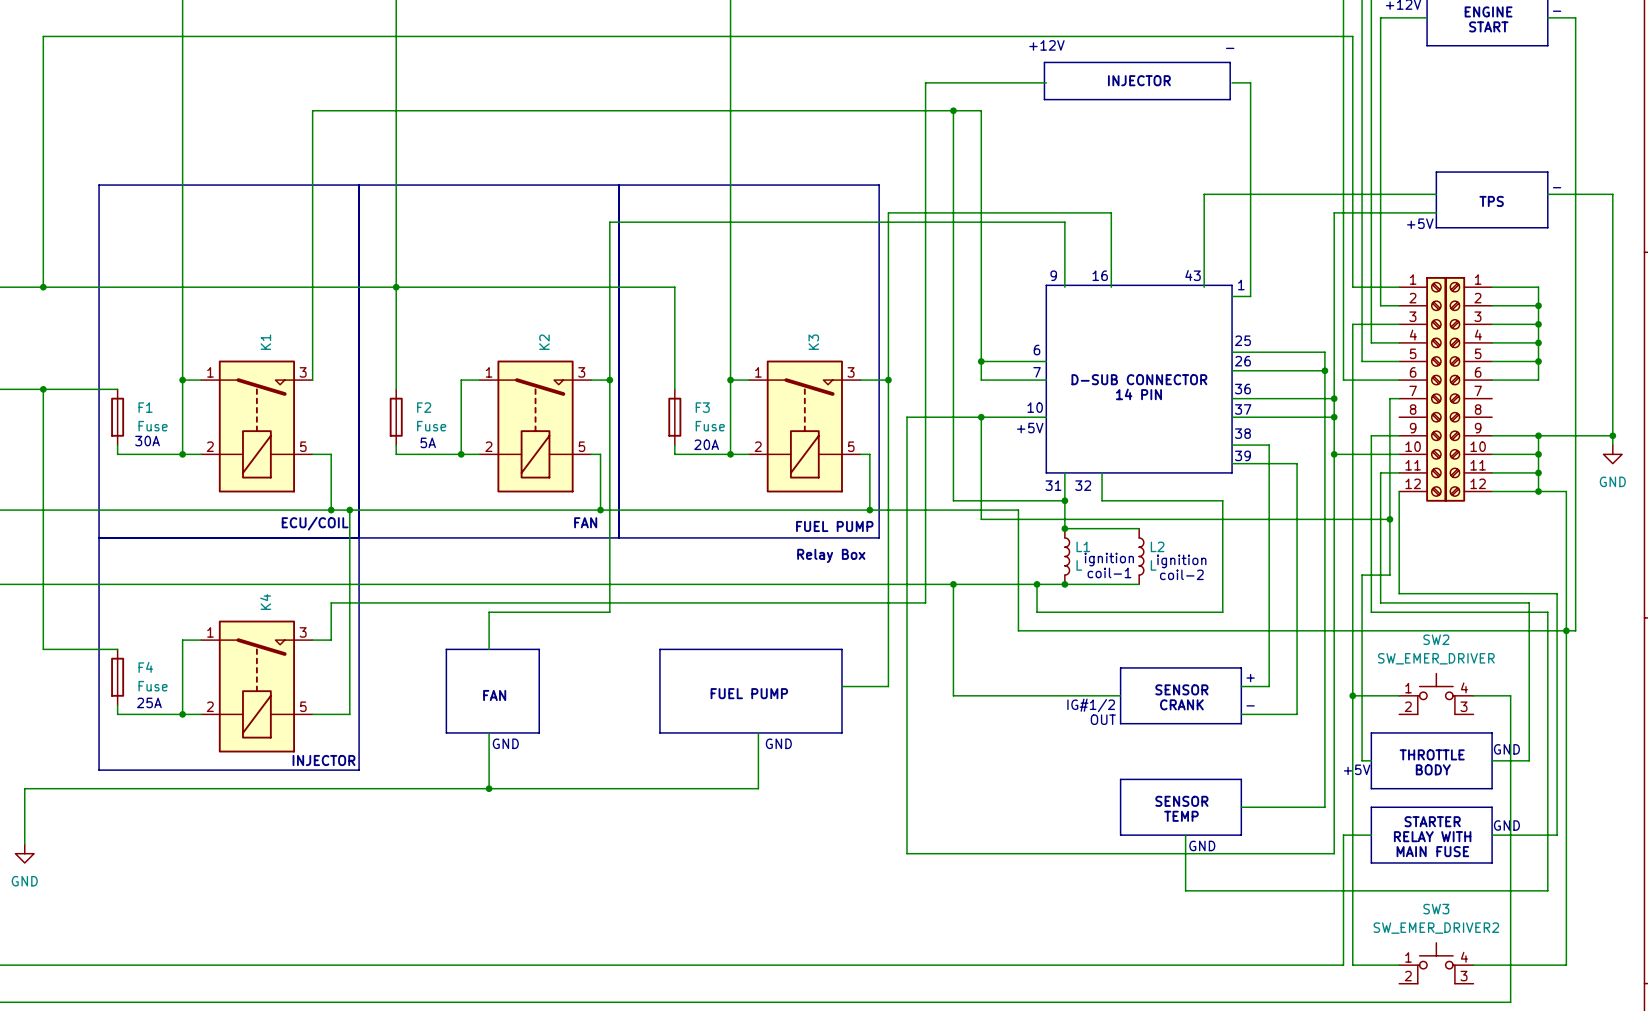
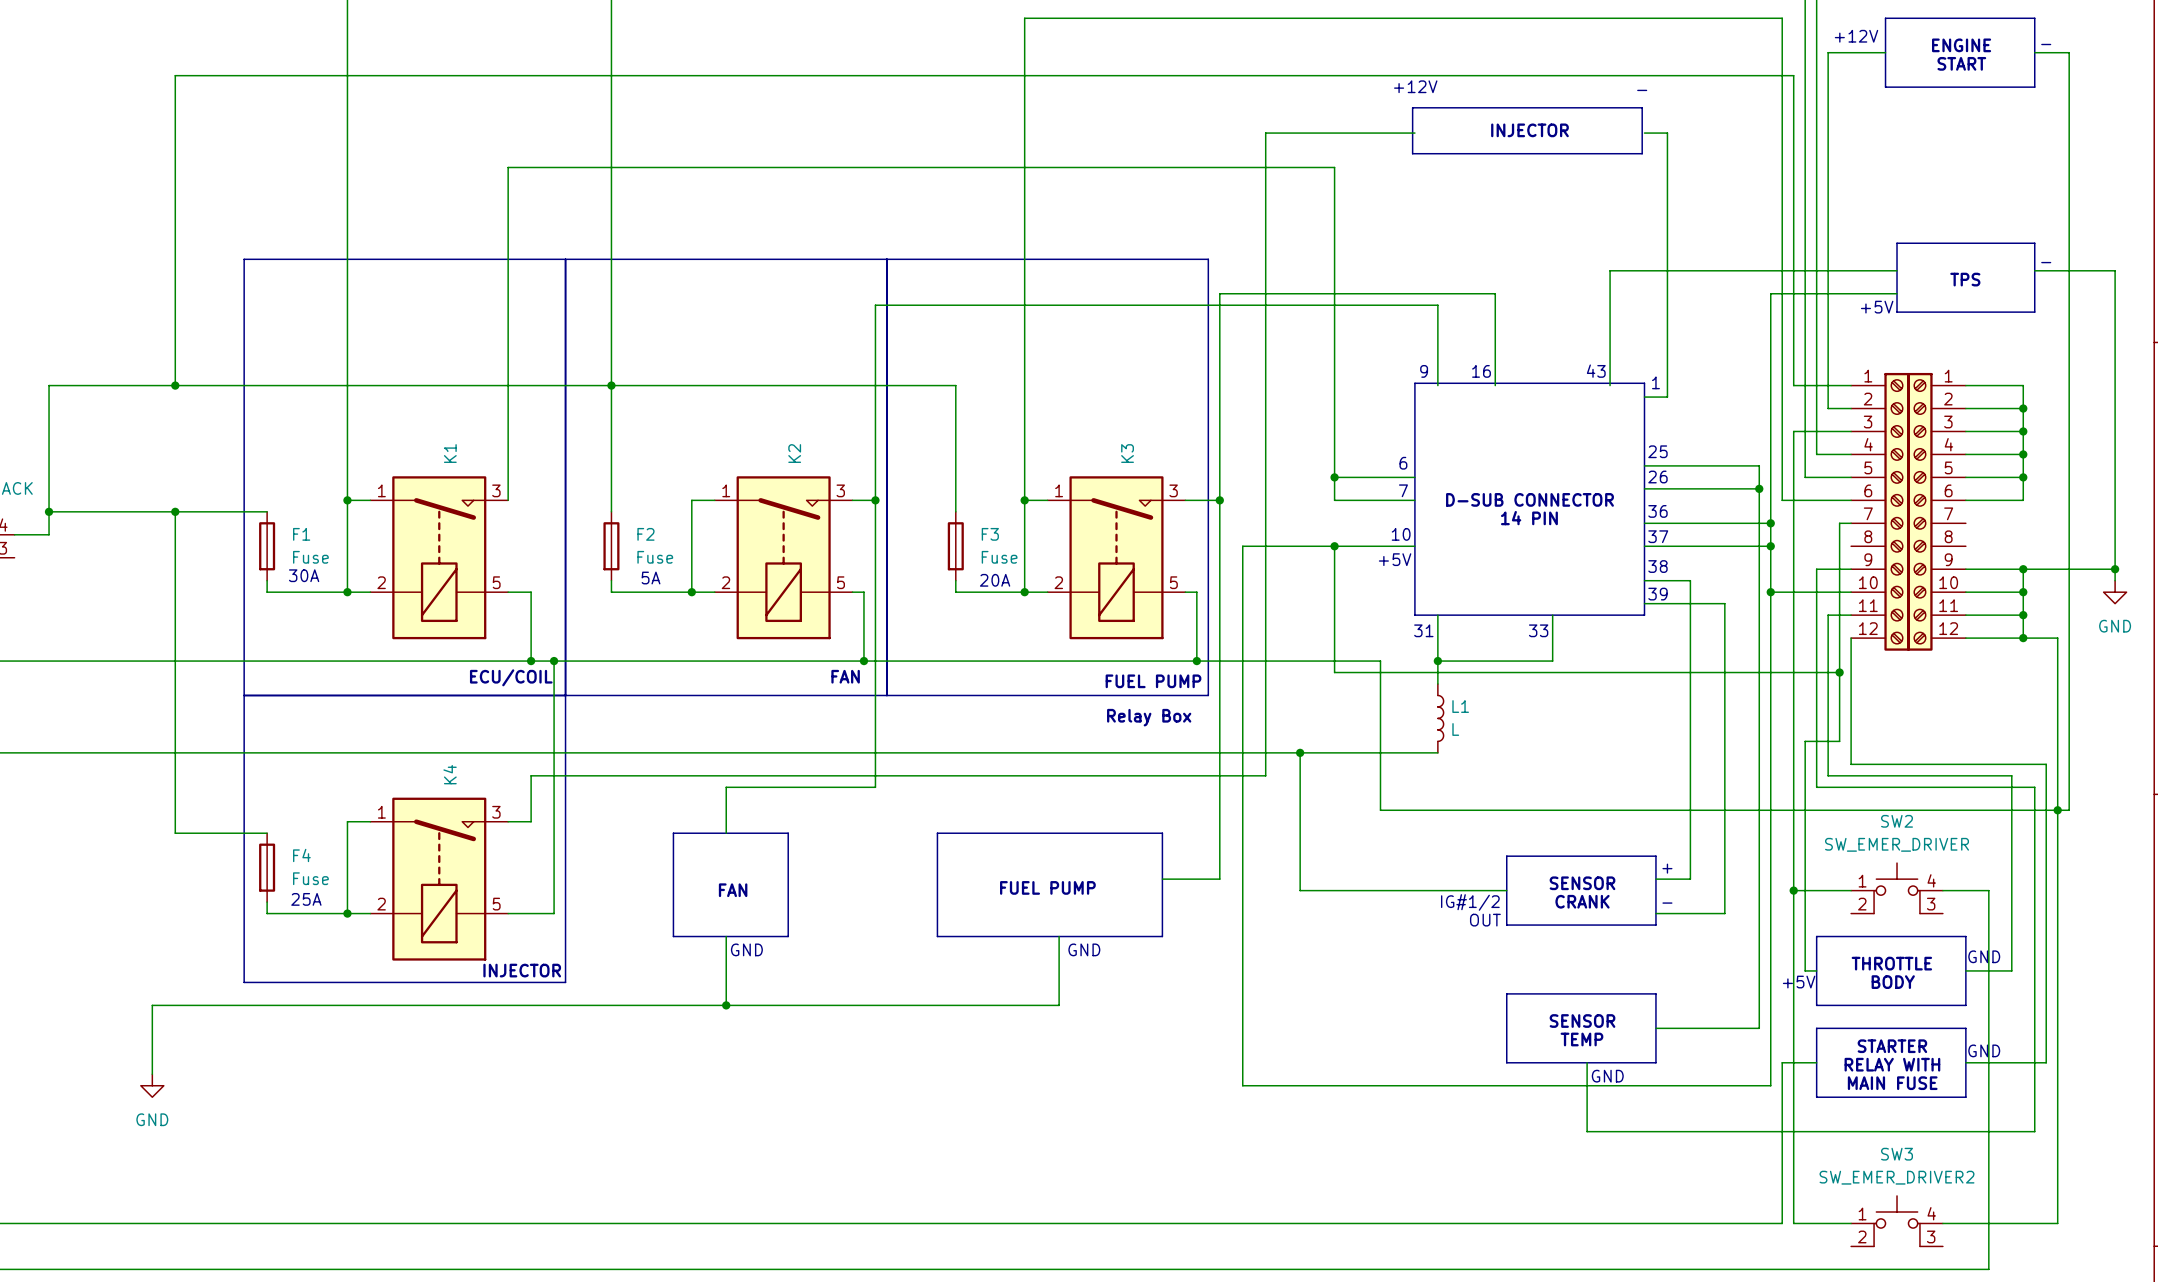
wire: (953, 110) (953, 500) (1064, 500) -> none
junction: (953, 110) -> none
wire: (1102, 472) (1102, 500) (1222, 500) (1222, 612) (1037, 612) (1037, 584) -> none
wire: none -> (1552, 615) (1552, 661) (1437, 661)
text: 32 (1083, 485) -> none
text: none -> 33 (1538, 630)
junction: (1064, 500) -> none
junction: none -> (1437, 661)
wire: (1064, 528) (1139, 528) -> none
junction: (1064, 528) -> none
L2: L (1141, 556) -> none
text: ignition (1109, 559) -> none
text: ignition (1181, 561) -> none
text: coil-1 (1109, 572) -> none
text: coil-2 (1181, 574) -> none
junction: (1037, 584) -> none
wire: (1064, 584) (1139, 584) -> none
junction: (1064, 584) -> none

